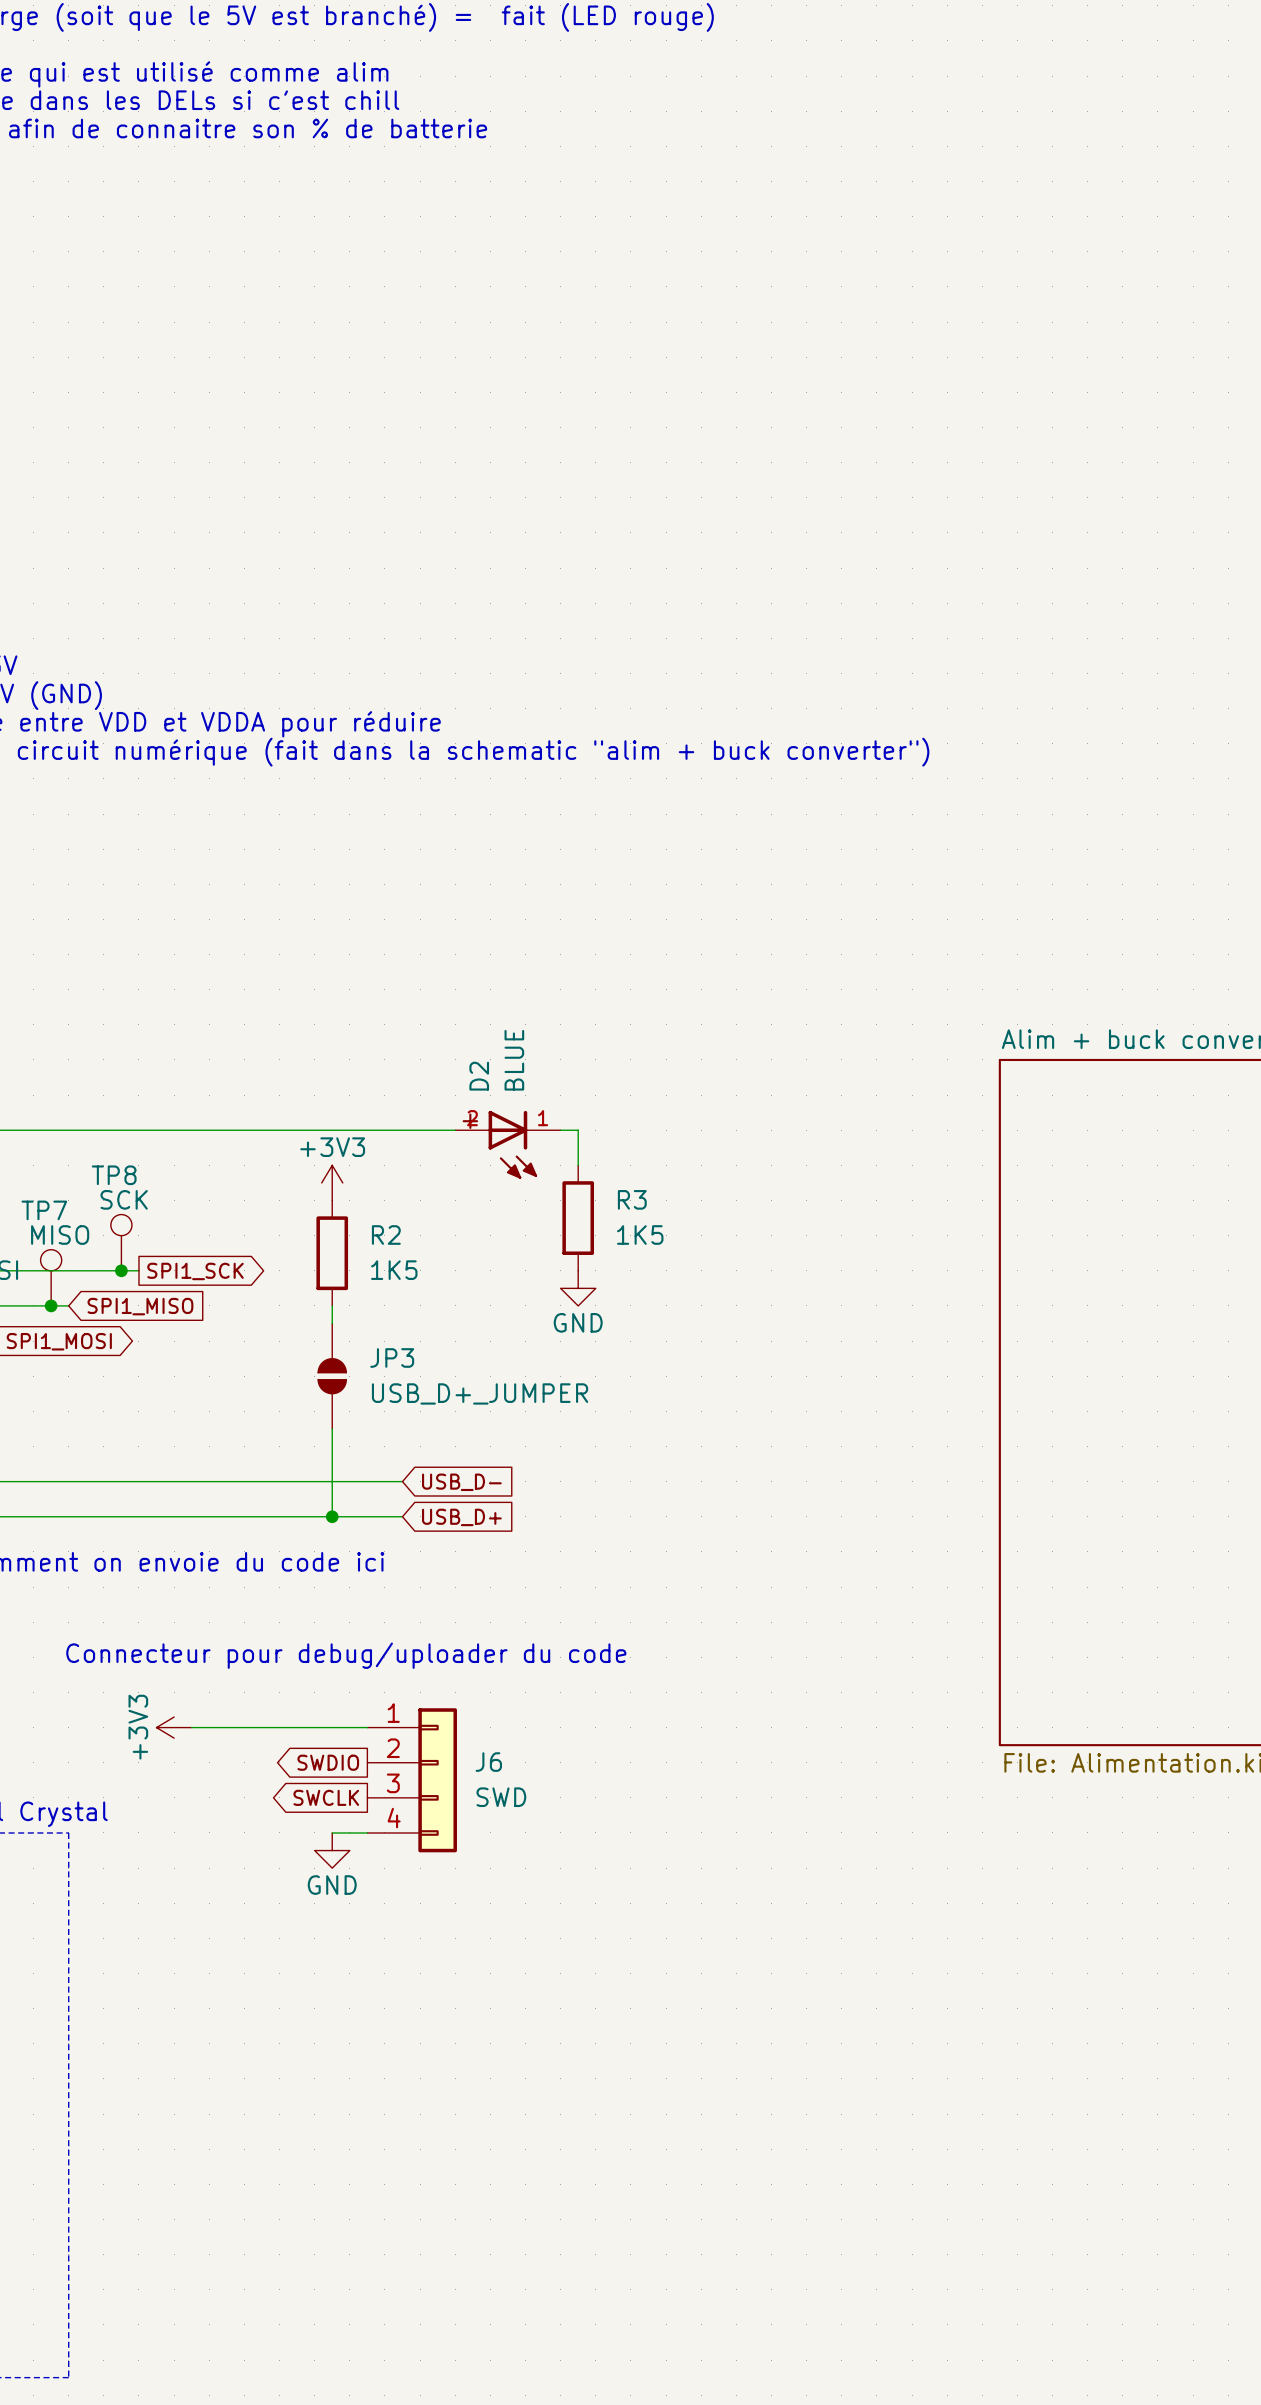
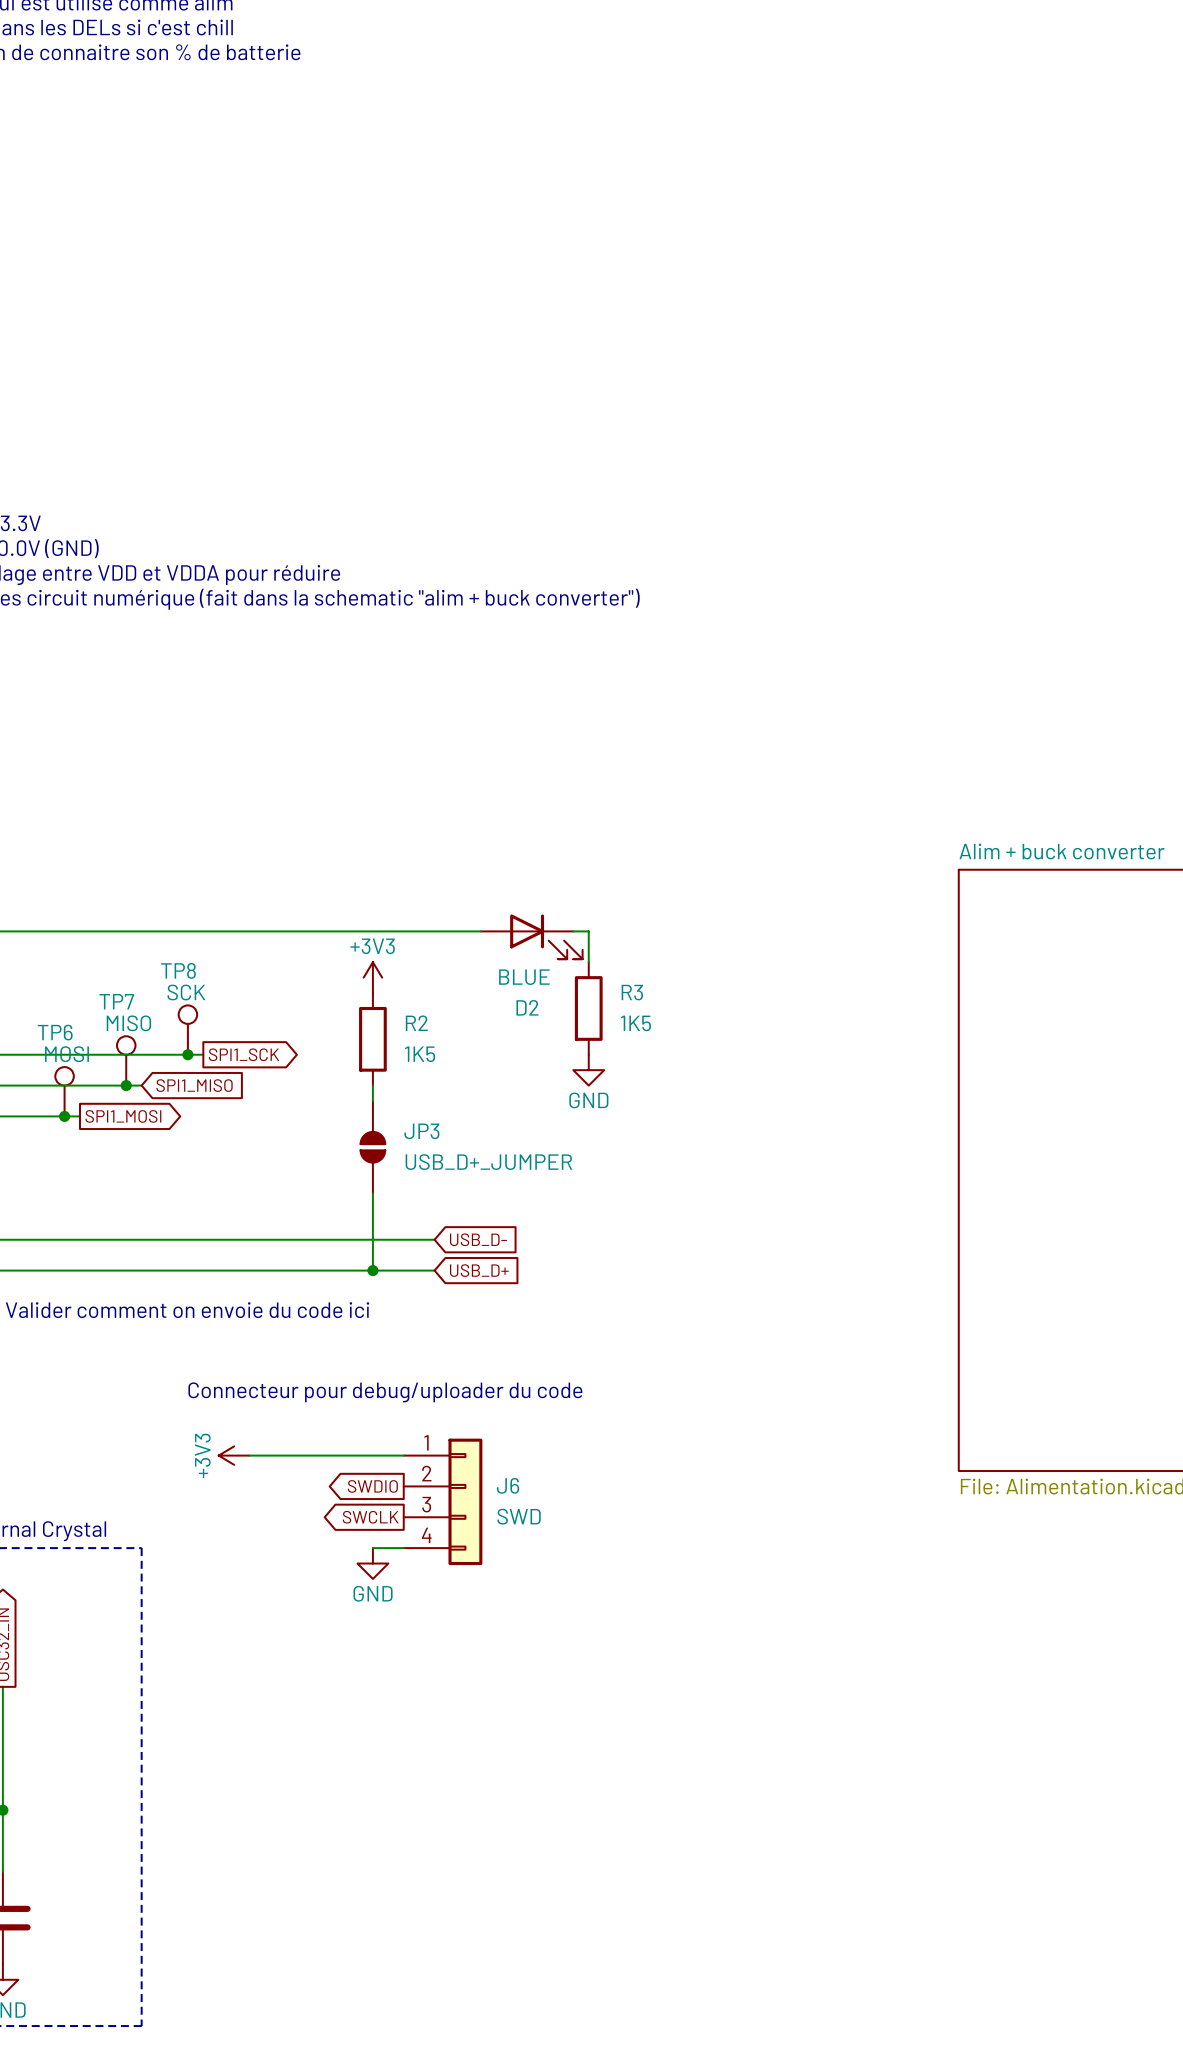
D2 value position: BLUE (514, 1060) -> BLUE (524, 977)
D2 name position: D2 (479, 1076) -> D2 (527, 1007)
D2 symbol: [455, 1110, 561, 1179] -> [480, 914, 583, 960]

